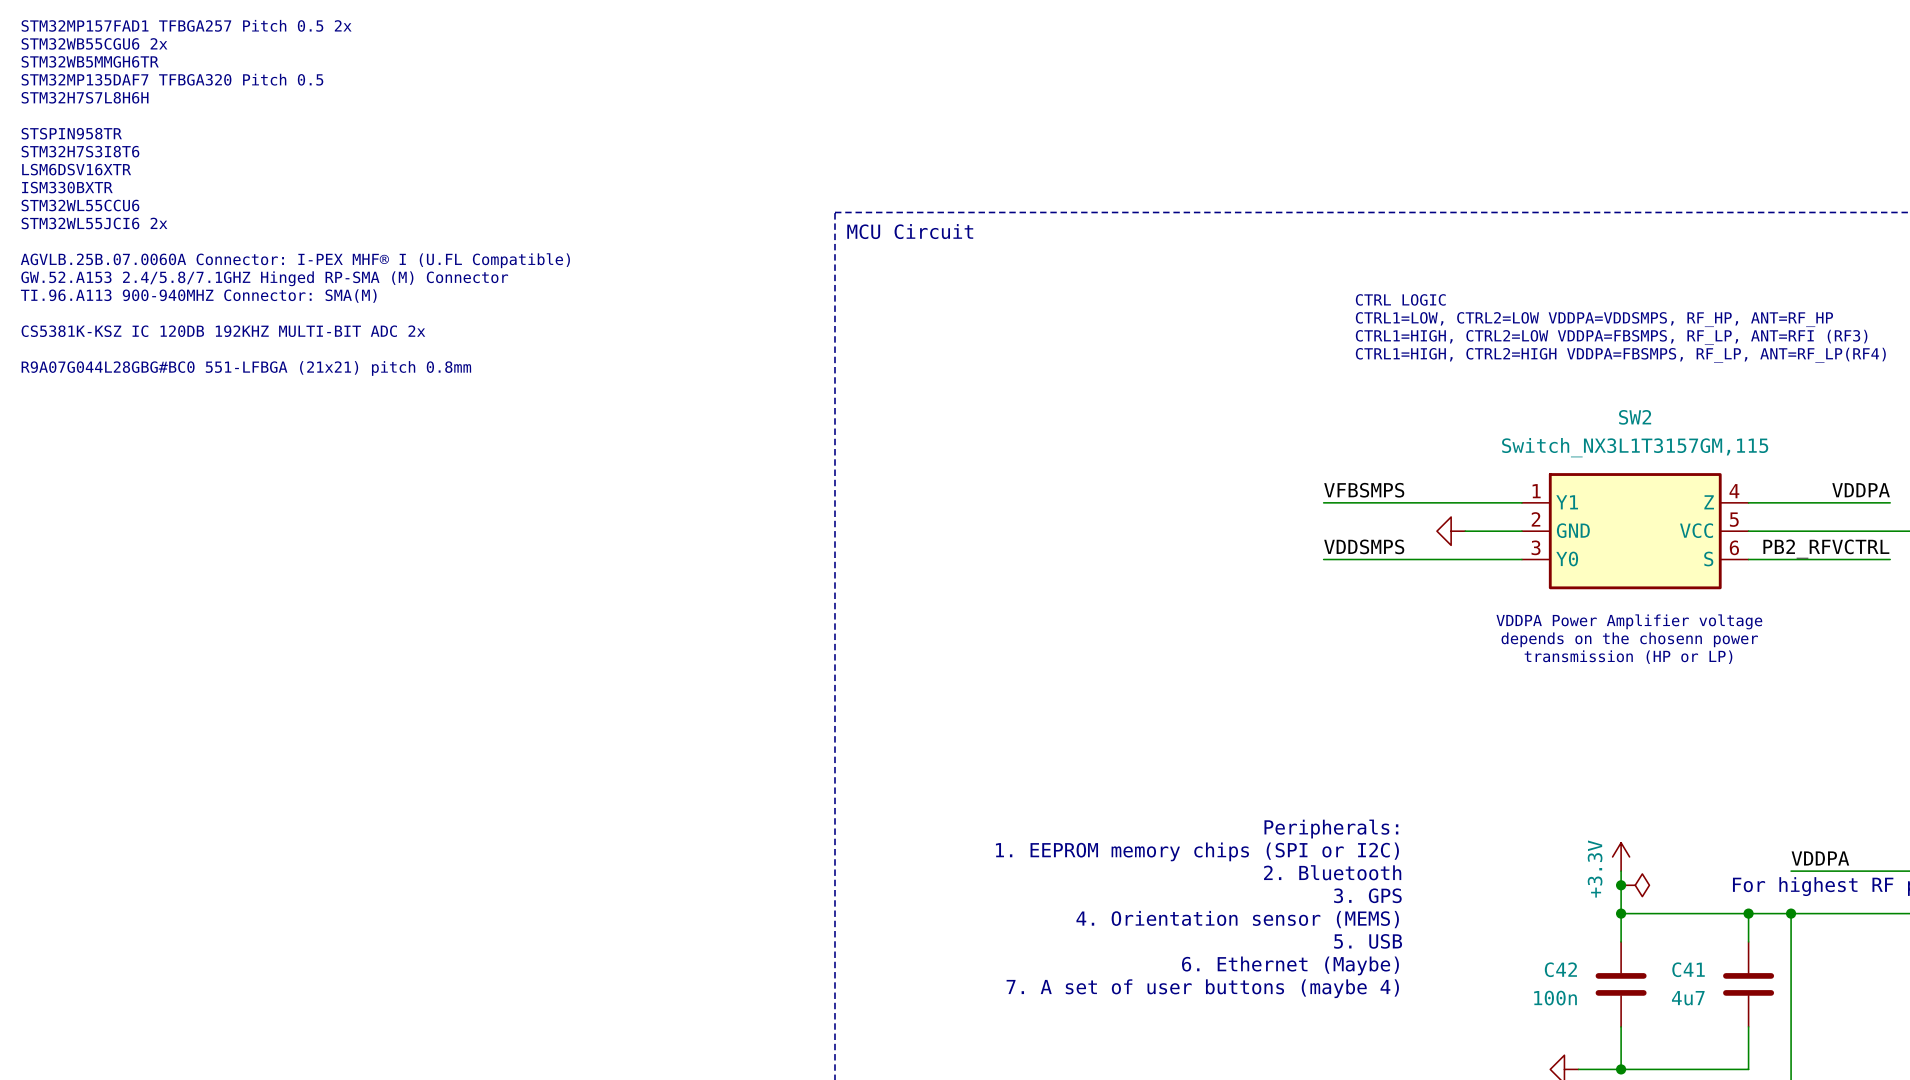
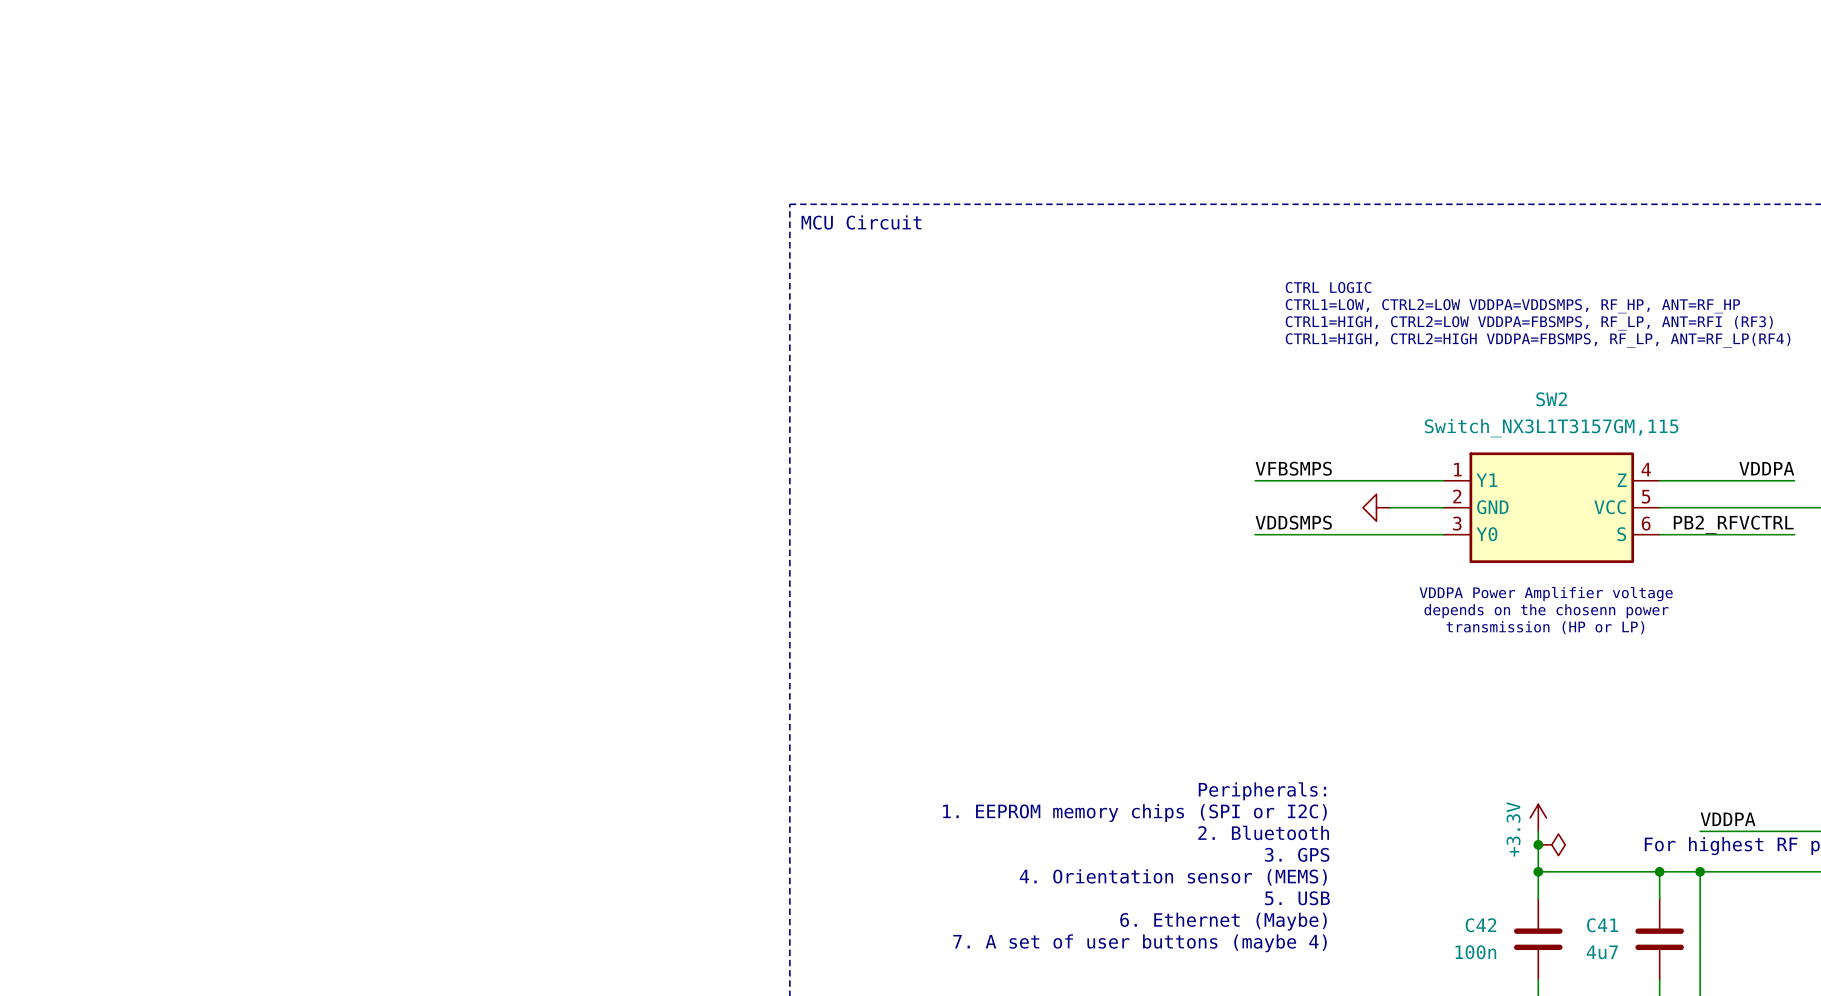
text: STM32MP157FAD1 TFBGA257 Pitch 0.5 2x (186, 25) -> none
text: STM32WB55CGU6 2x (94, 43) -> none
text: STM32WB5MMGH6TR (90, 61) -> none
text: STM32MP135DAF7 TFBGA320 Pitch 0.5 (172, 79) -> none
text: STM32H7S7L8H6H (85, 97) -> none
text: STSPIN958TR (71, 133) -> none
text: STM32H7S3I8T6 (80, 151) -> none
text: LSM6DSV16XTR (76, 169) -> none
text: ISM330BXTR (67, 187) -> none
text: STM32WL55CCU6 (80, 205) -> none
text: STM32WL55JCI6 2x (94, 223) -> none
text: AGVLB.25B.07.0060A Connector: I-PEX MHF® I (U.FL Compatible) (295, 260) -> none
text: GW.52.A153 2.4/5.8/7.1GHZ Hinged RP-SMA (M) Connector (264, 278) -> none
text: TI.96.A113 900-940MHZ Connector: SMA(M) (198, 296) -> none
text: CS5381K-KSZ IC 120DB 192KHZ MULTI-BIT ADC 2x (223, 331) -> none
text: R9A07G044L28GBG#BC0 551-LFBGA (21x21) pitch 0.8mm (246, 368) -> none

